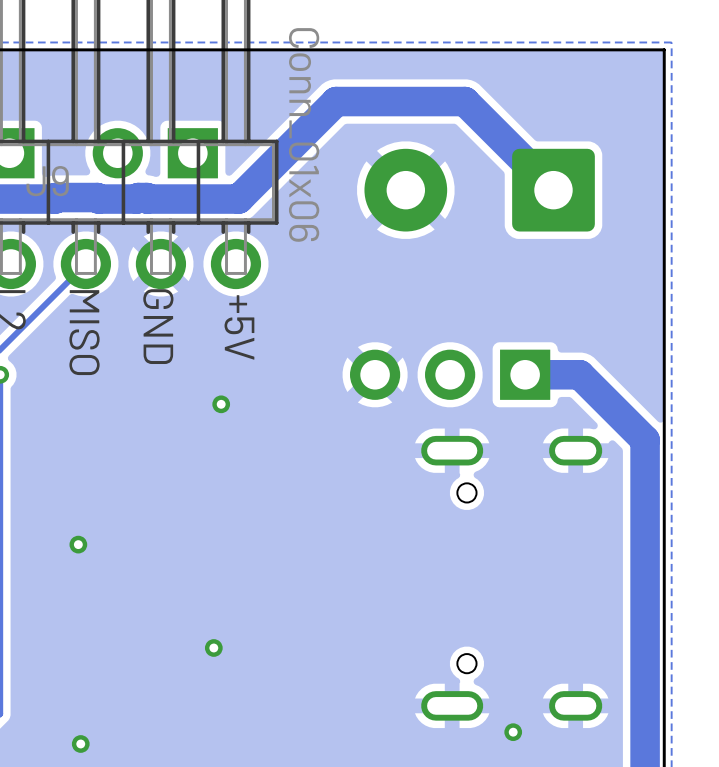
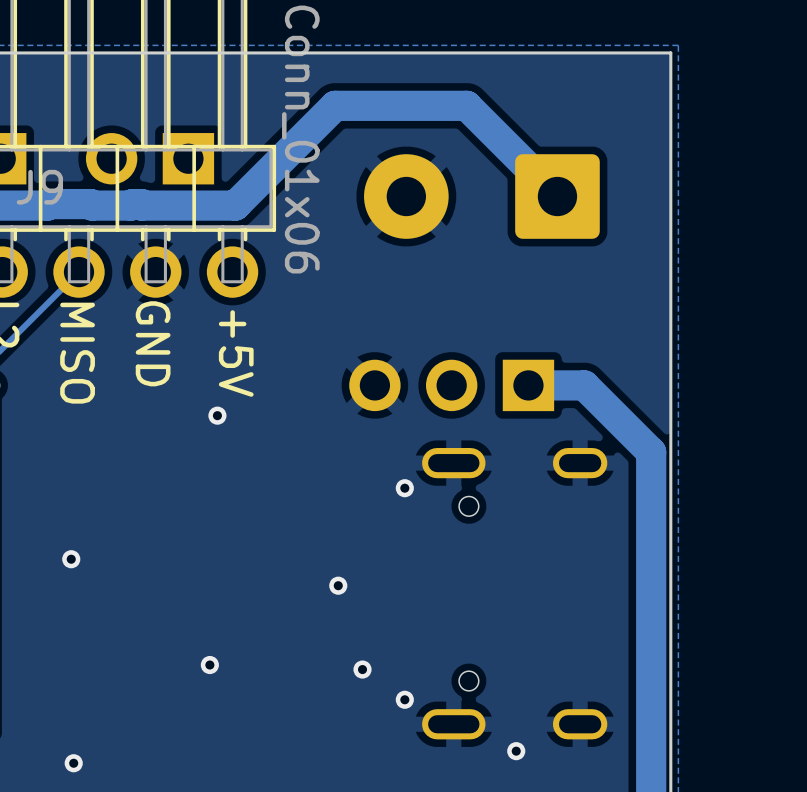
via: none -> (404, 488)
via: none -> (338, 585)
via: none -> (362, 669)
via: none -> (404, 699)

